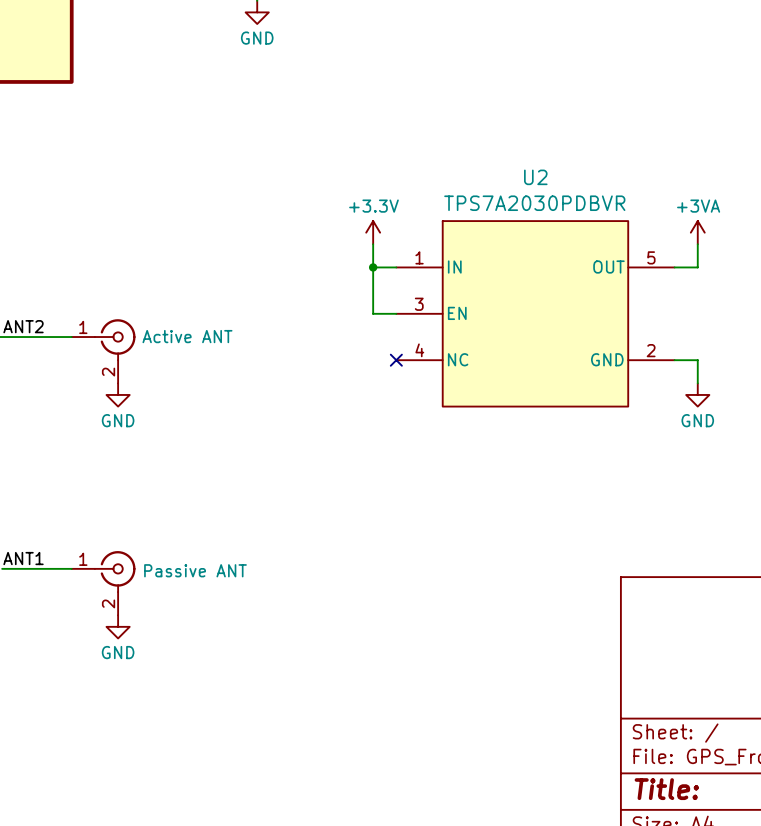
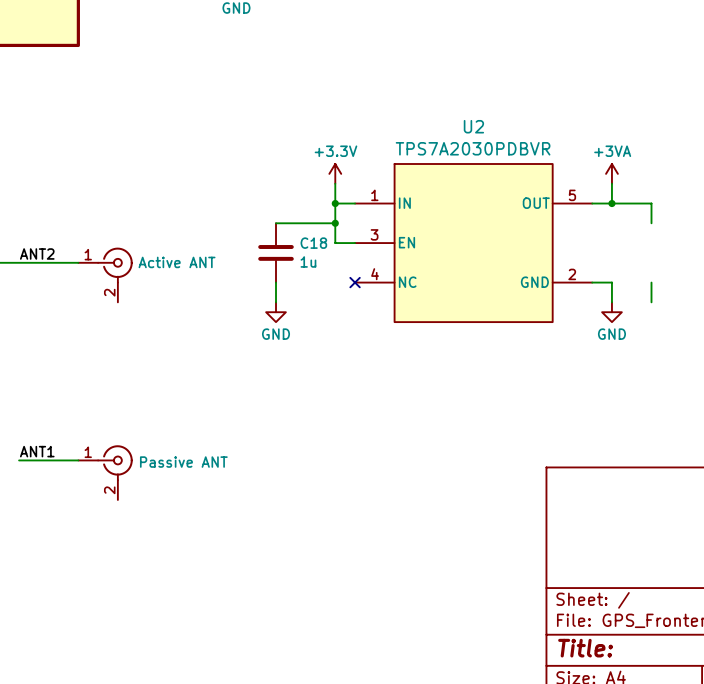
wire: none -> (611, 203) (651, 203) (651, 223)
junction: none -> (611, 203)
wire: none -> (276, 223) (335, 223)
junction: none -> (335, 223)
C18: none -> 1u (276, 252)
wire: none -> (276, 282) (276, 302)
wire: none -> (651, 282) (651, 302)
power symbol: GND (118, 394) -> none
power symbol: none -> GND (276, 312)
power symbol: GND (118, 626) -> none

